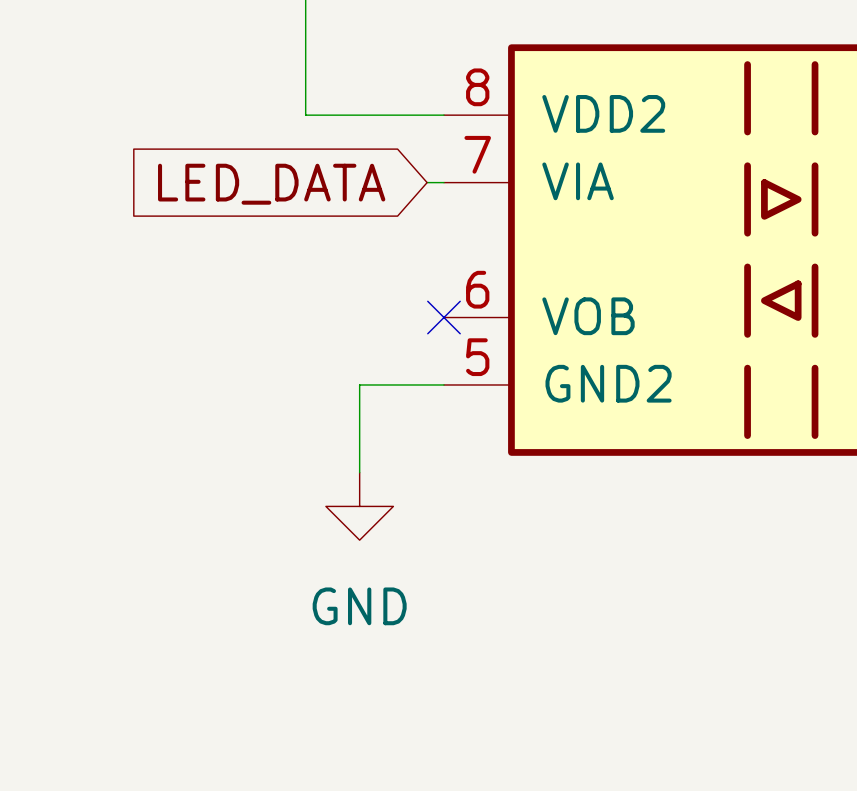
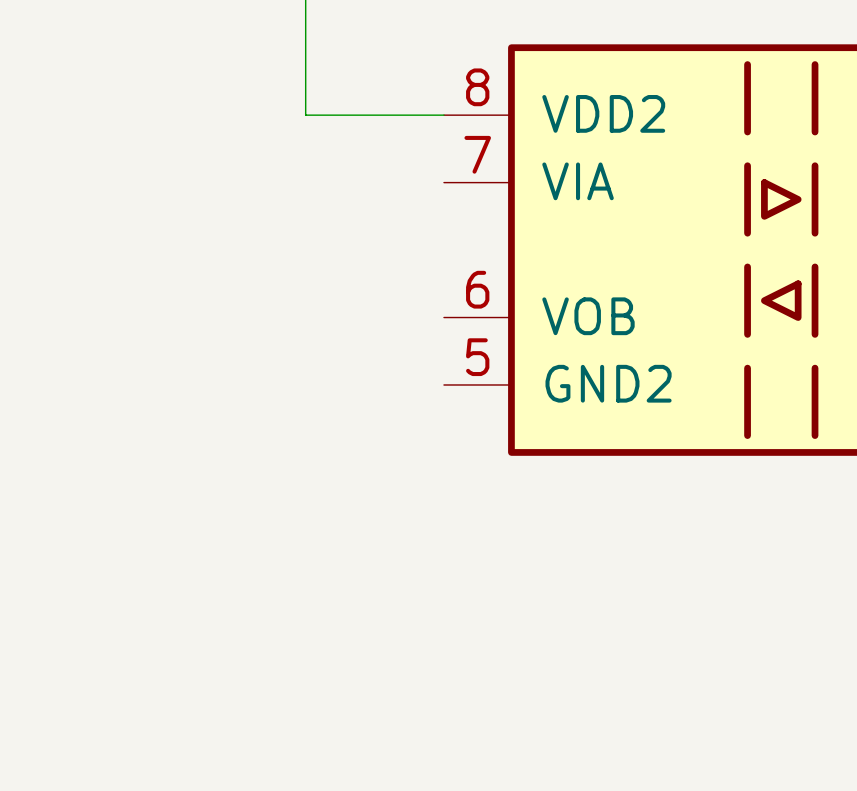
wire: (427, 182) (443, 182) -> none
global label: LED_DATA (271, 184) -> none
no-connect mark: (443, 317) -> none
wire: (443, 384) (359, 384) (359, 472) -> none
power symbol: GND (359, 506) -> none

